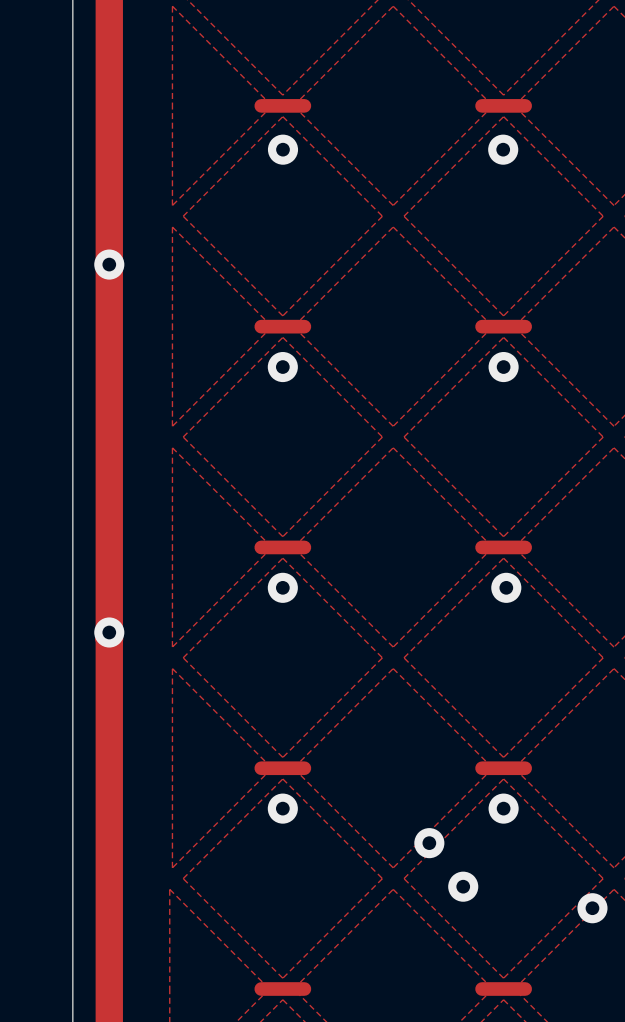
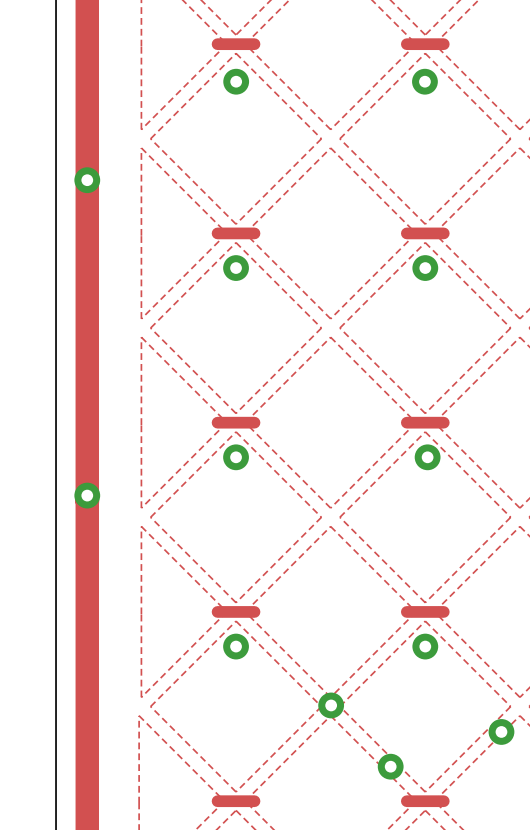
via: (429, 843) -> none
via: none -> (331, 705)
via: (463, 886) -> none
via: none -> (390, 766)

